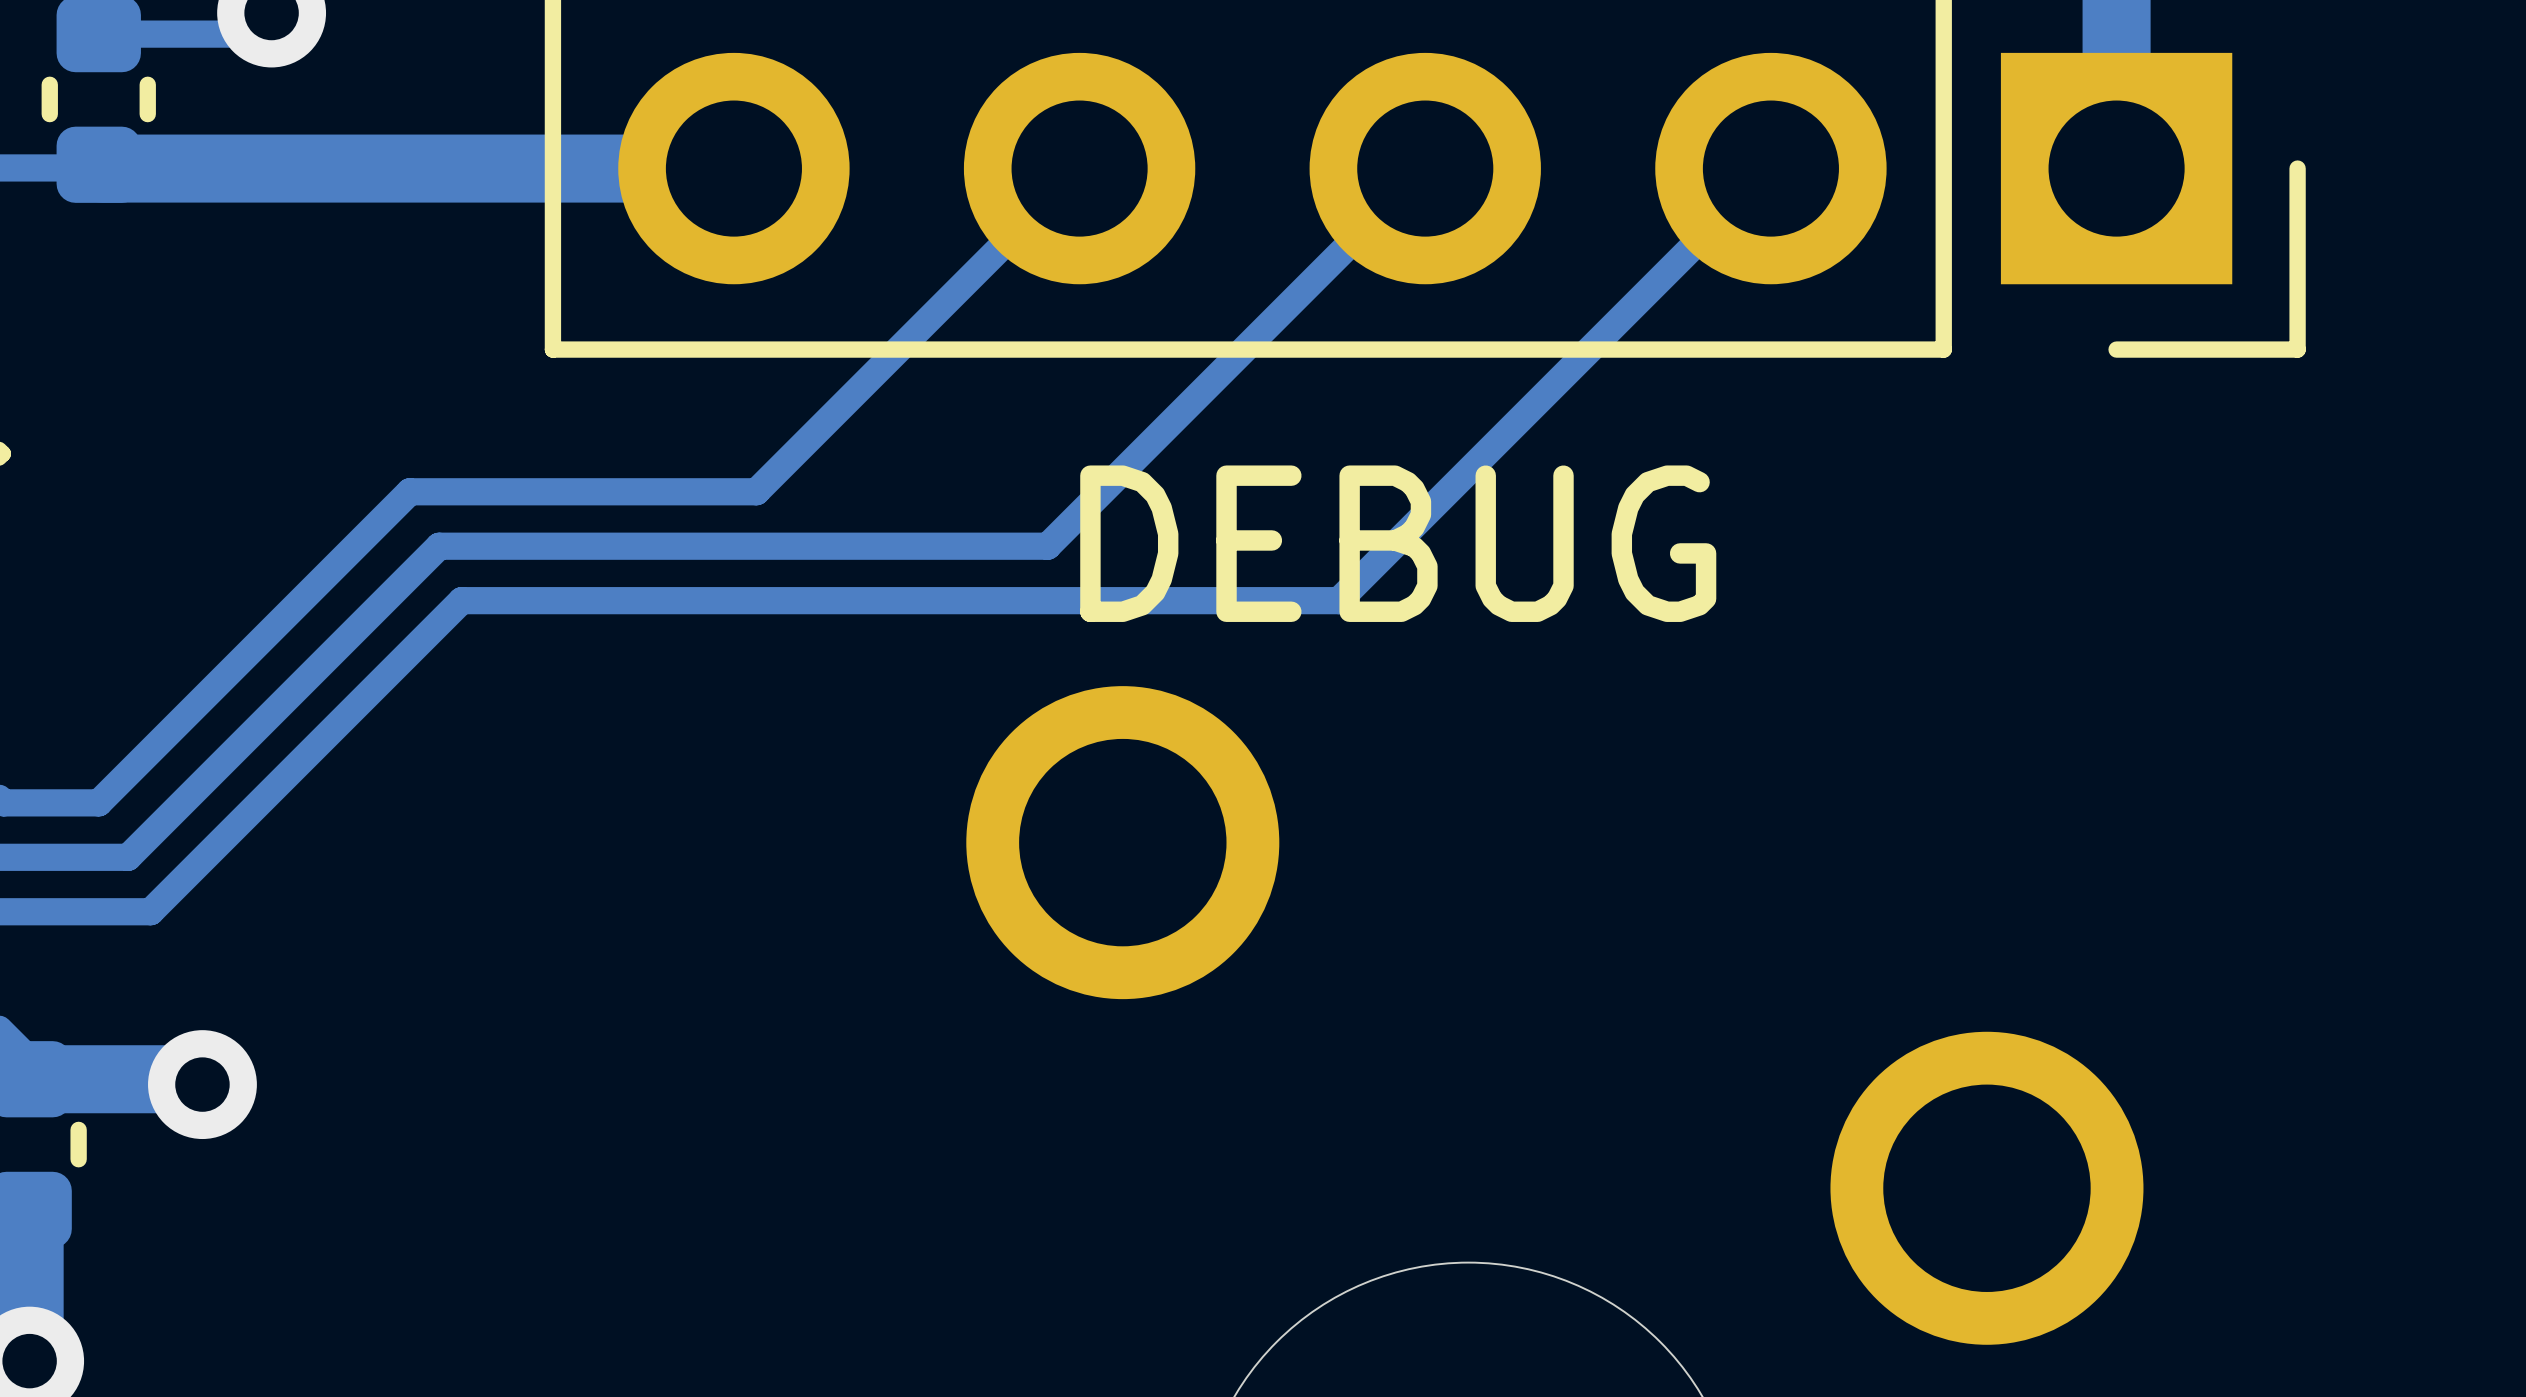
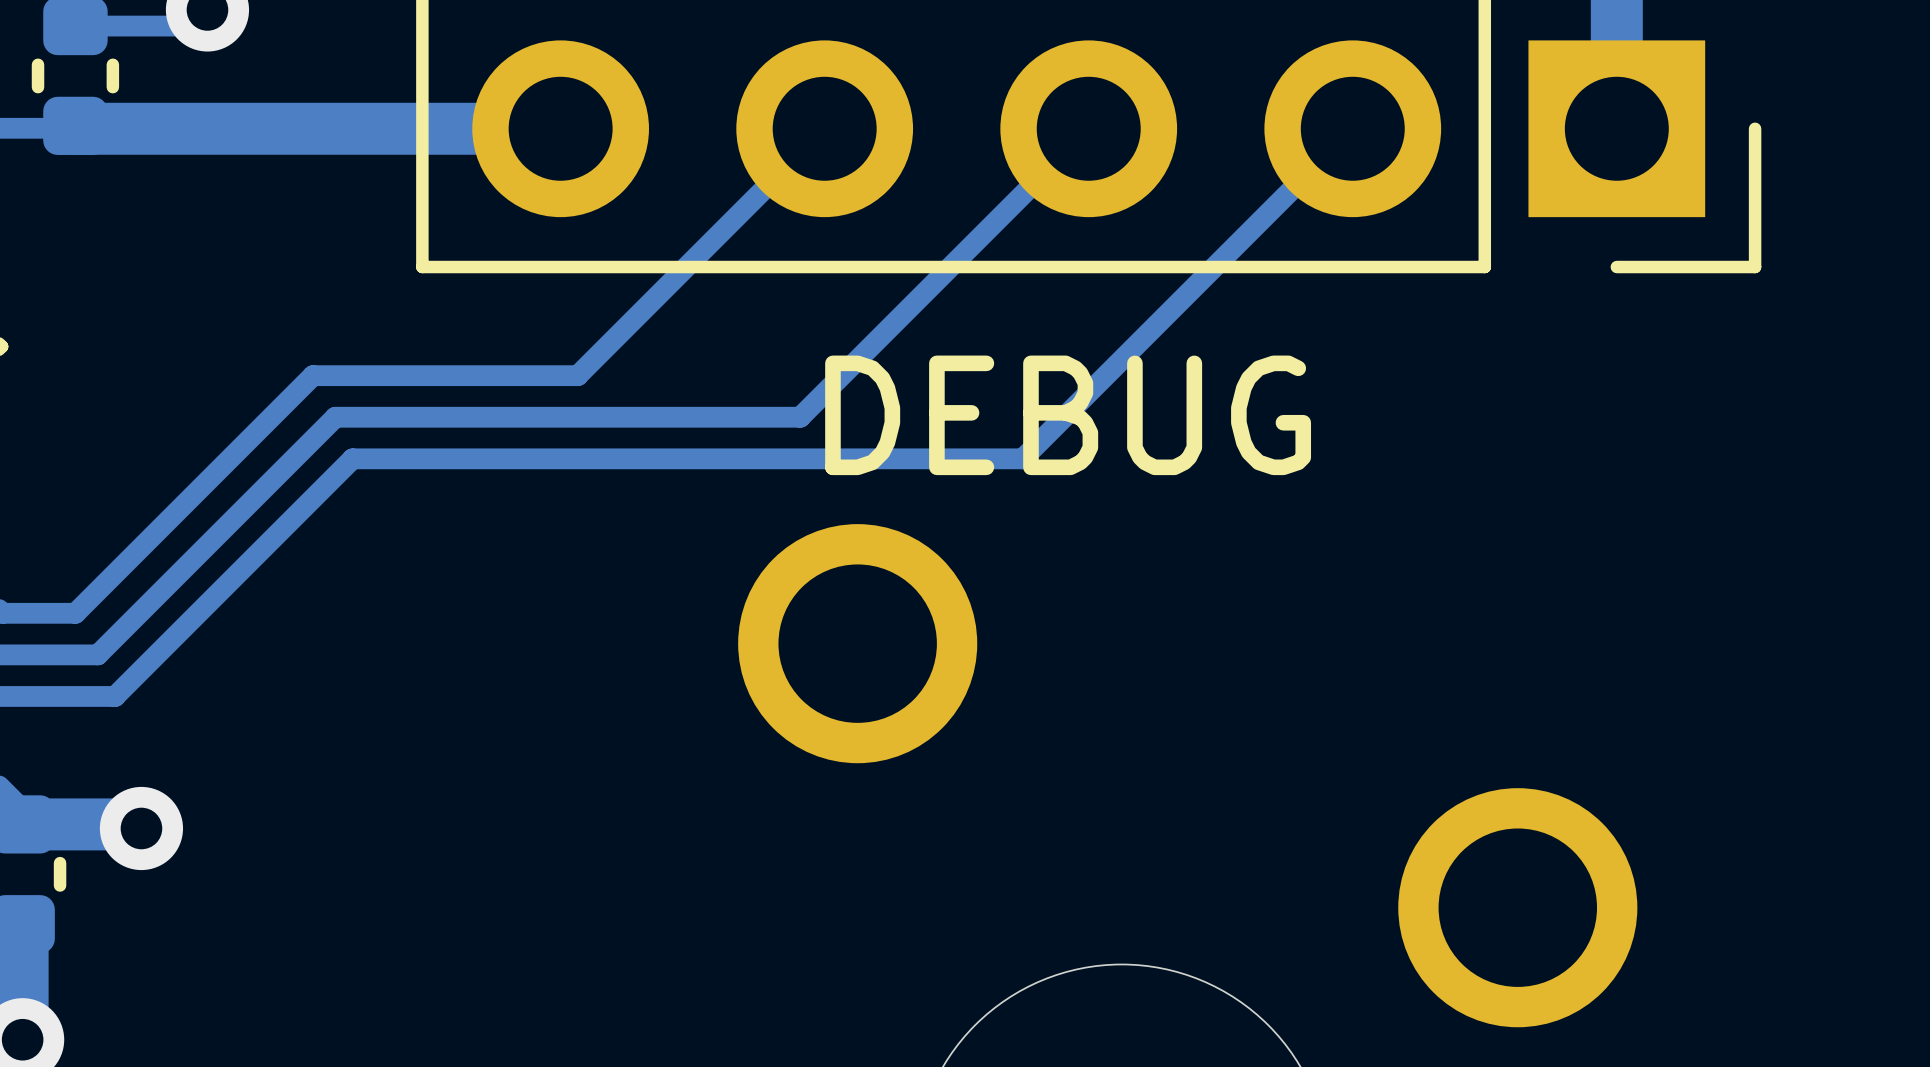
via position: (202, 1084) -> (141, 828)

